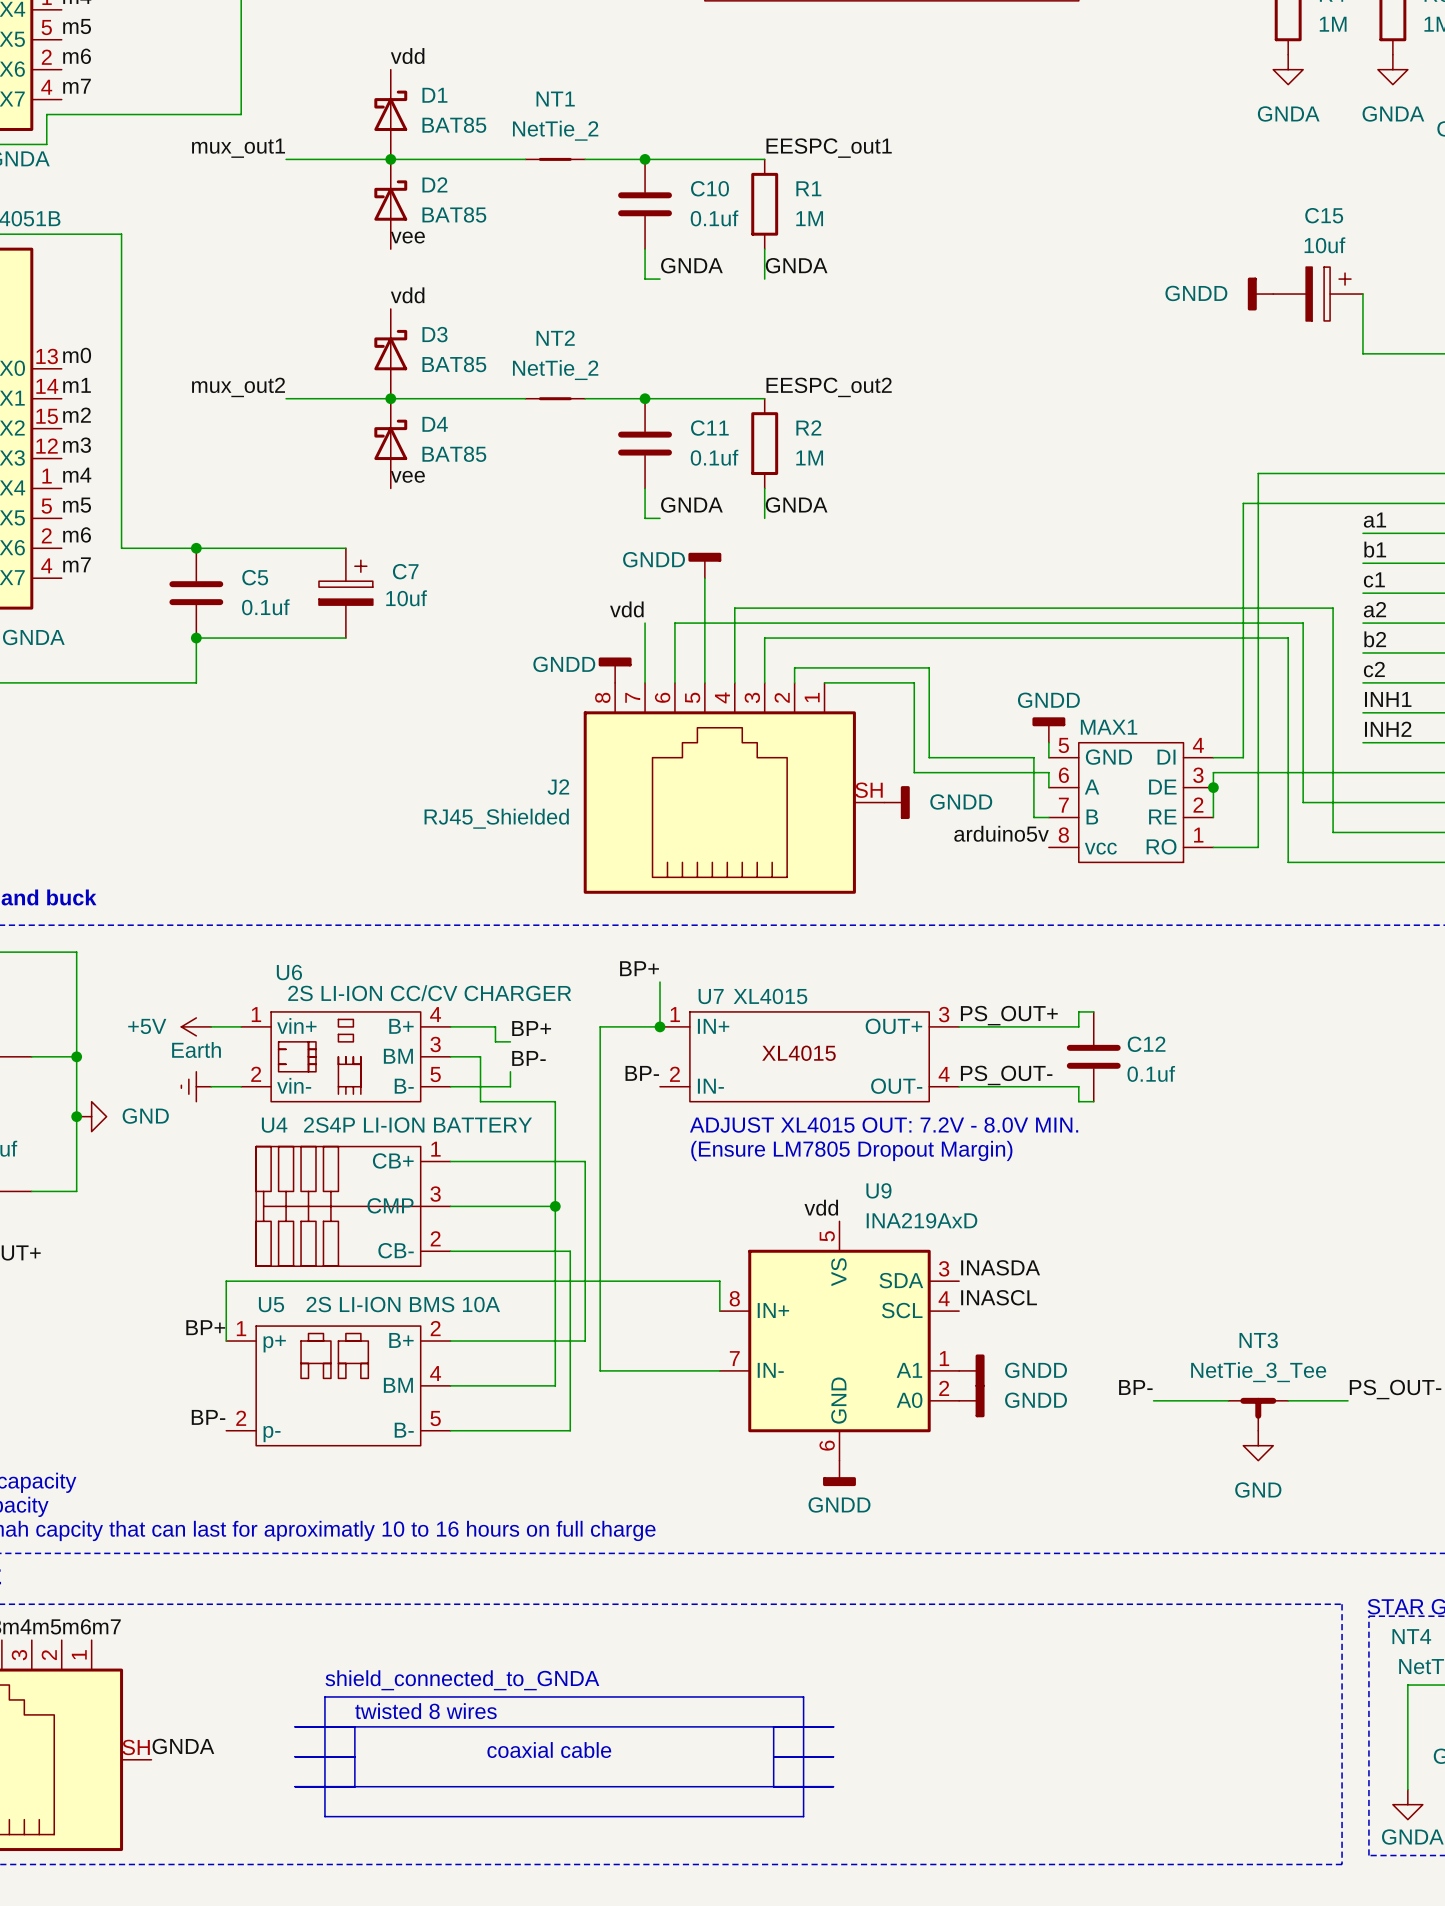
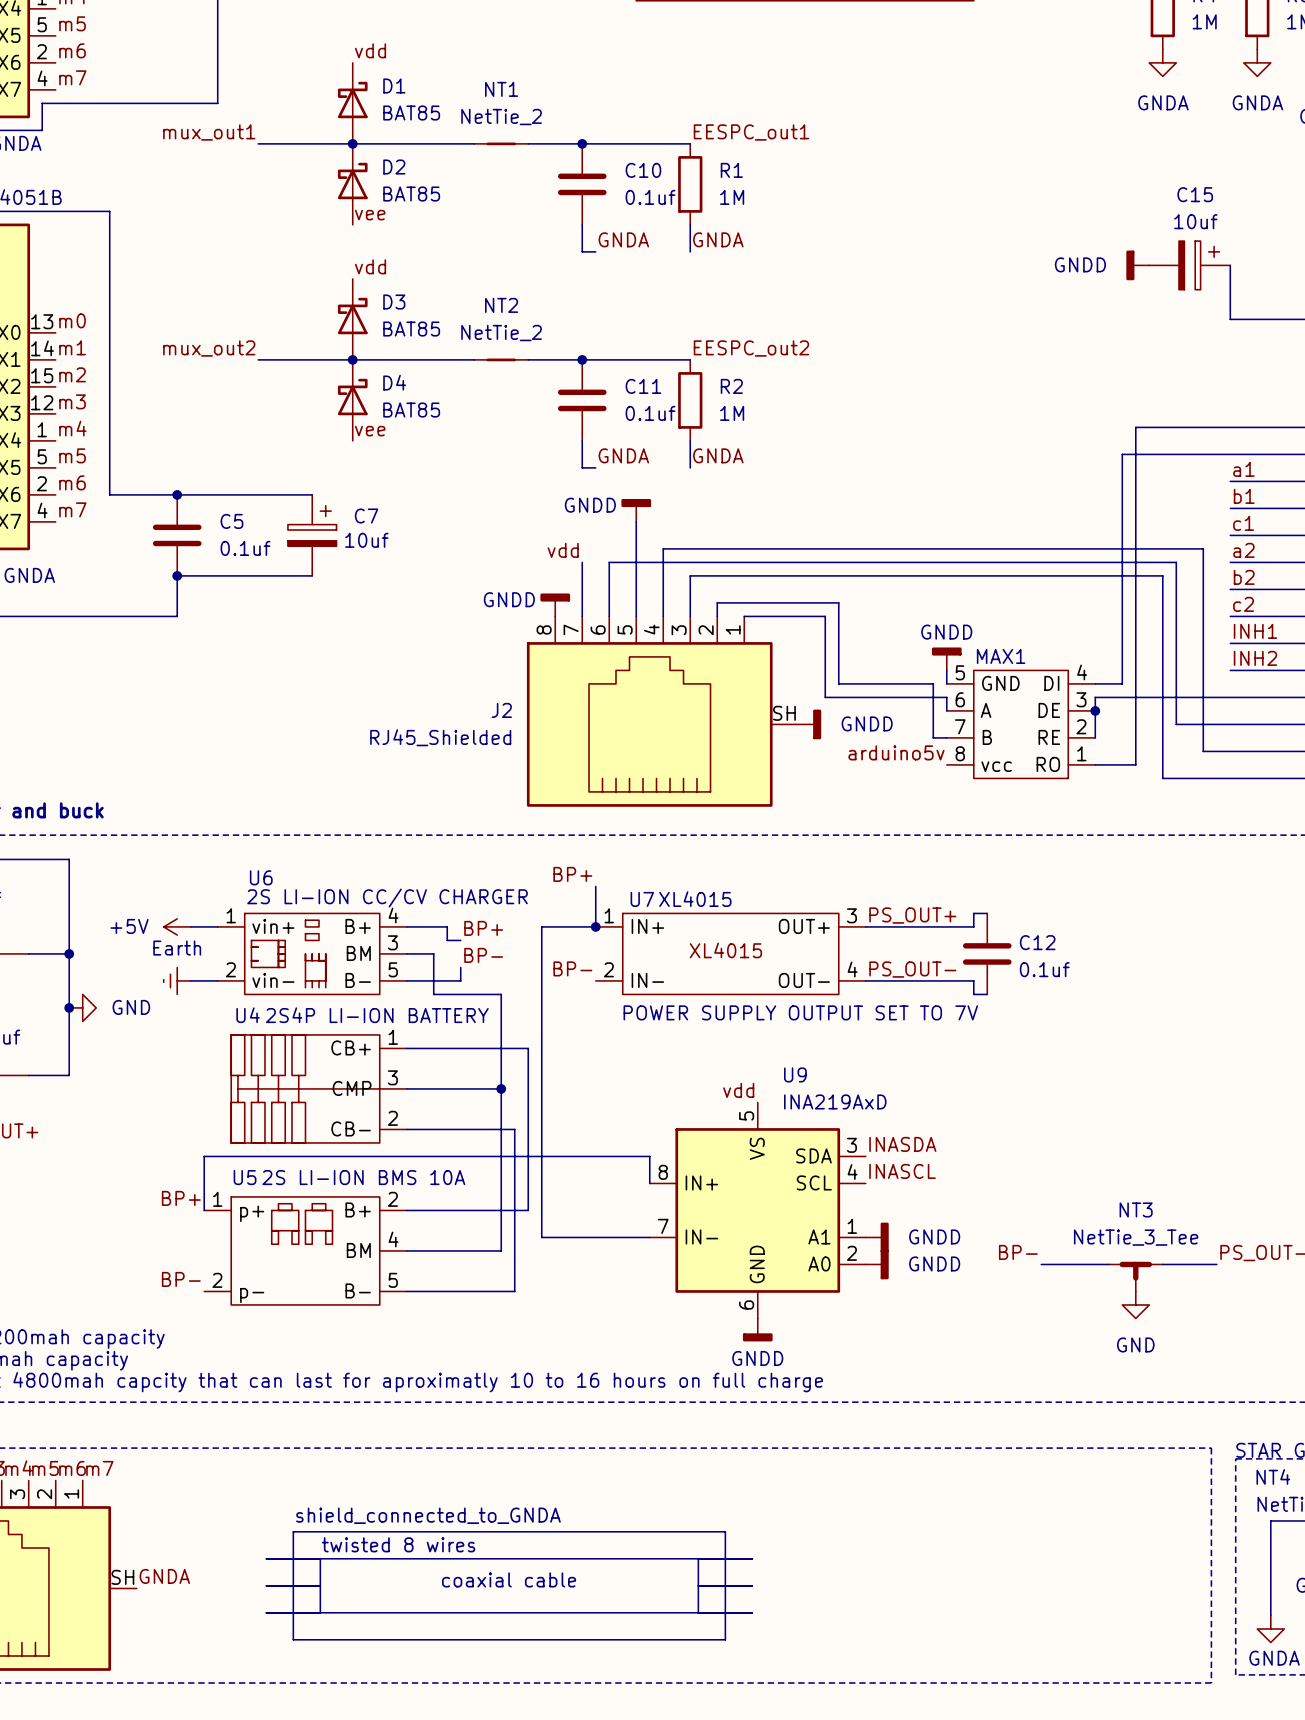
text: ADJUST XL4015 OUT: 7.2V - 8.0V MIN. (884, 1125) -> POWER SUPPLY OUTPUT SET TO 7V (800, 1012)
text: (Ensure LM7805 Dropout Margin) (851, 1150) -> none

